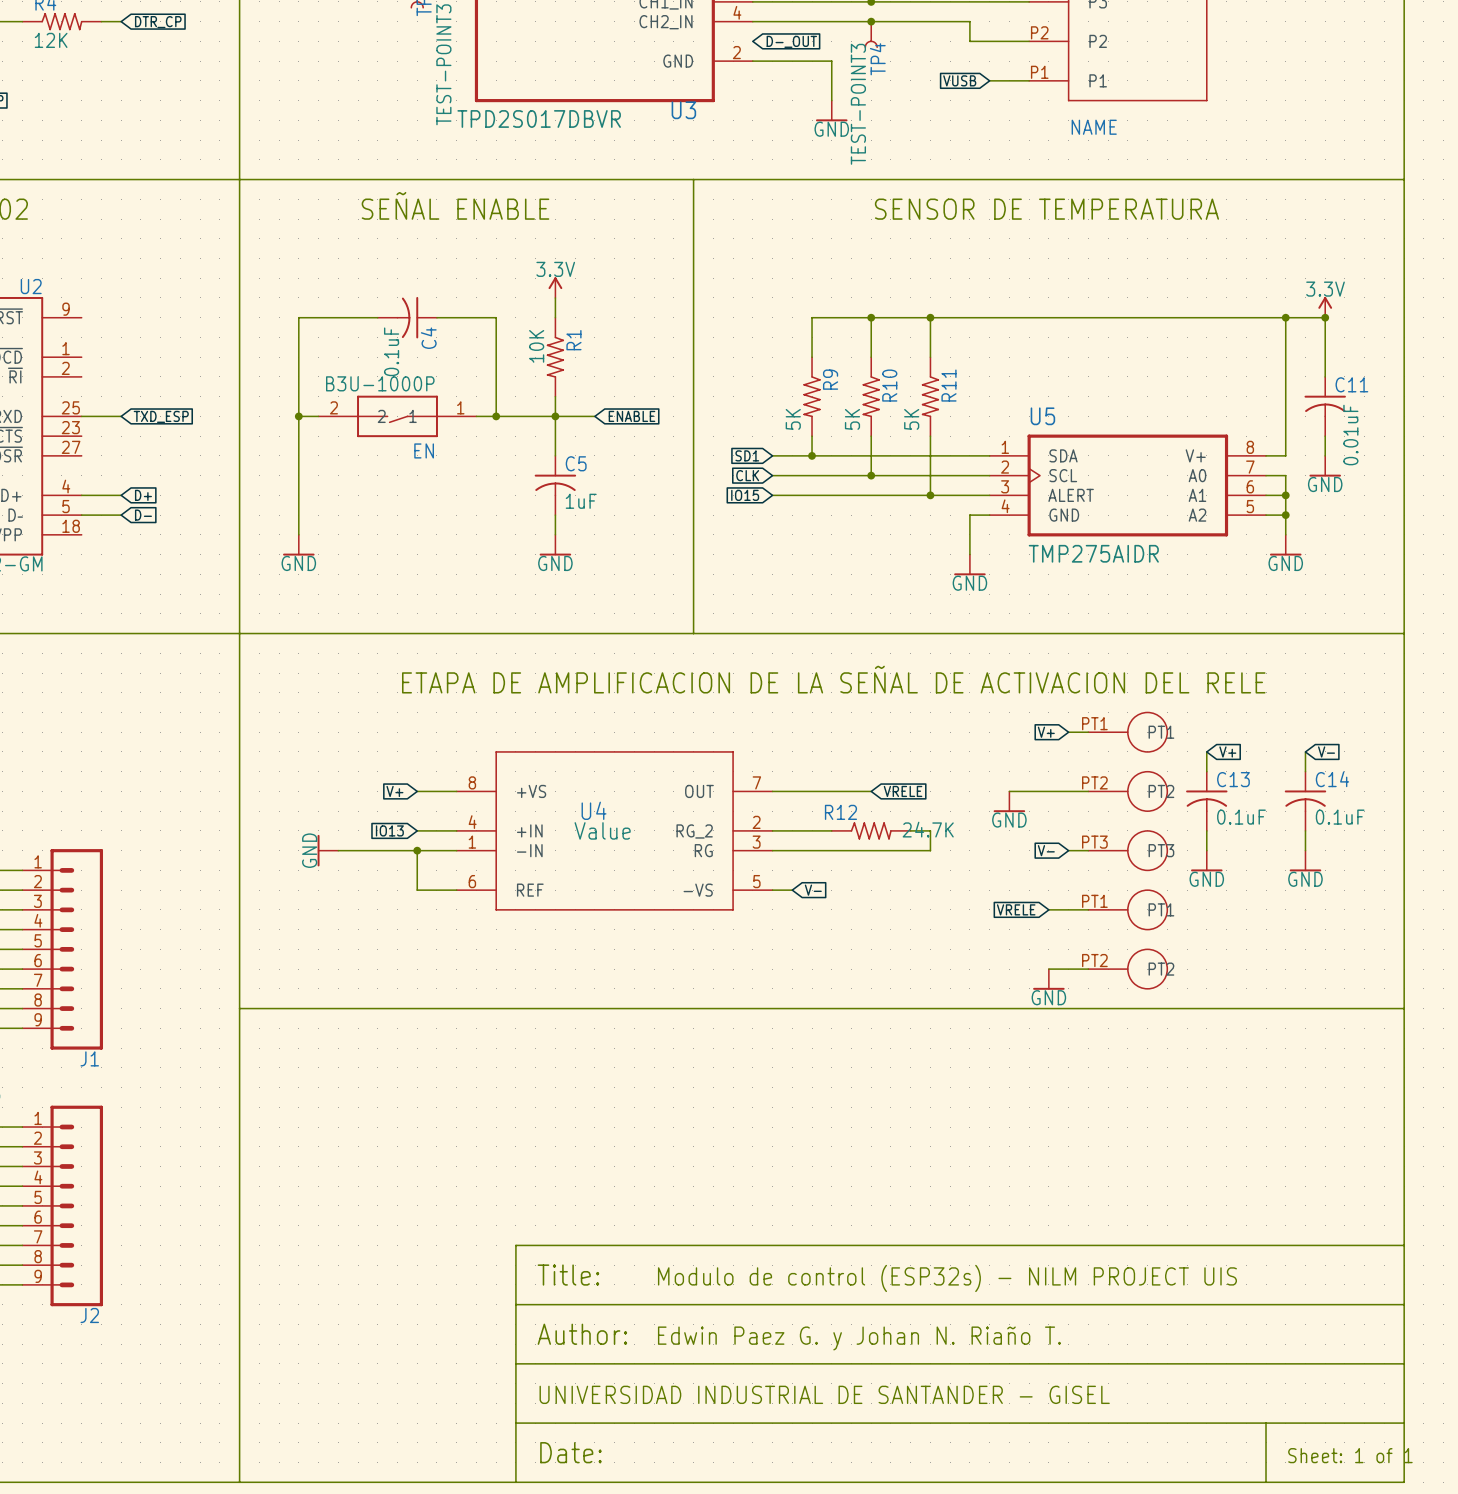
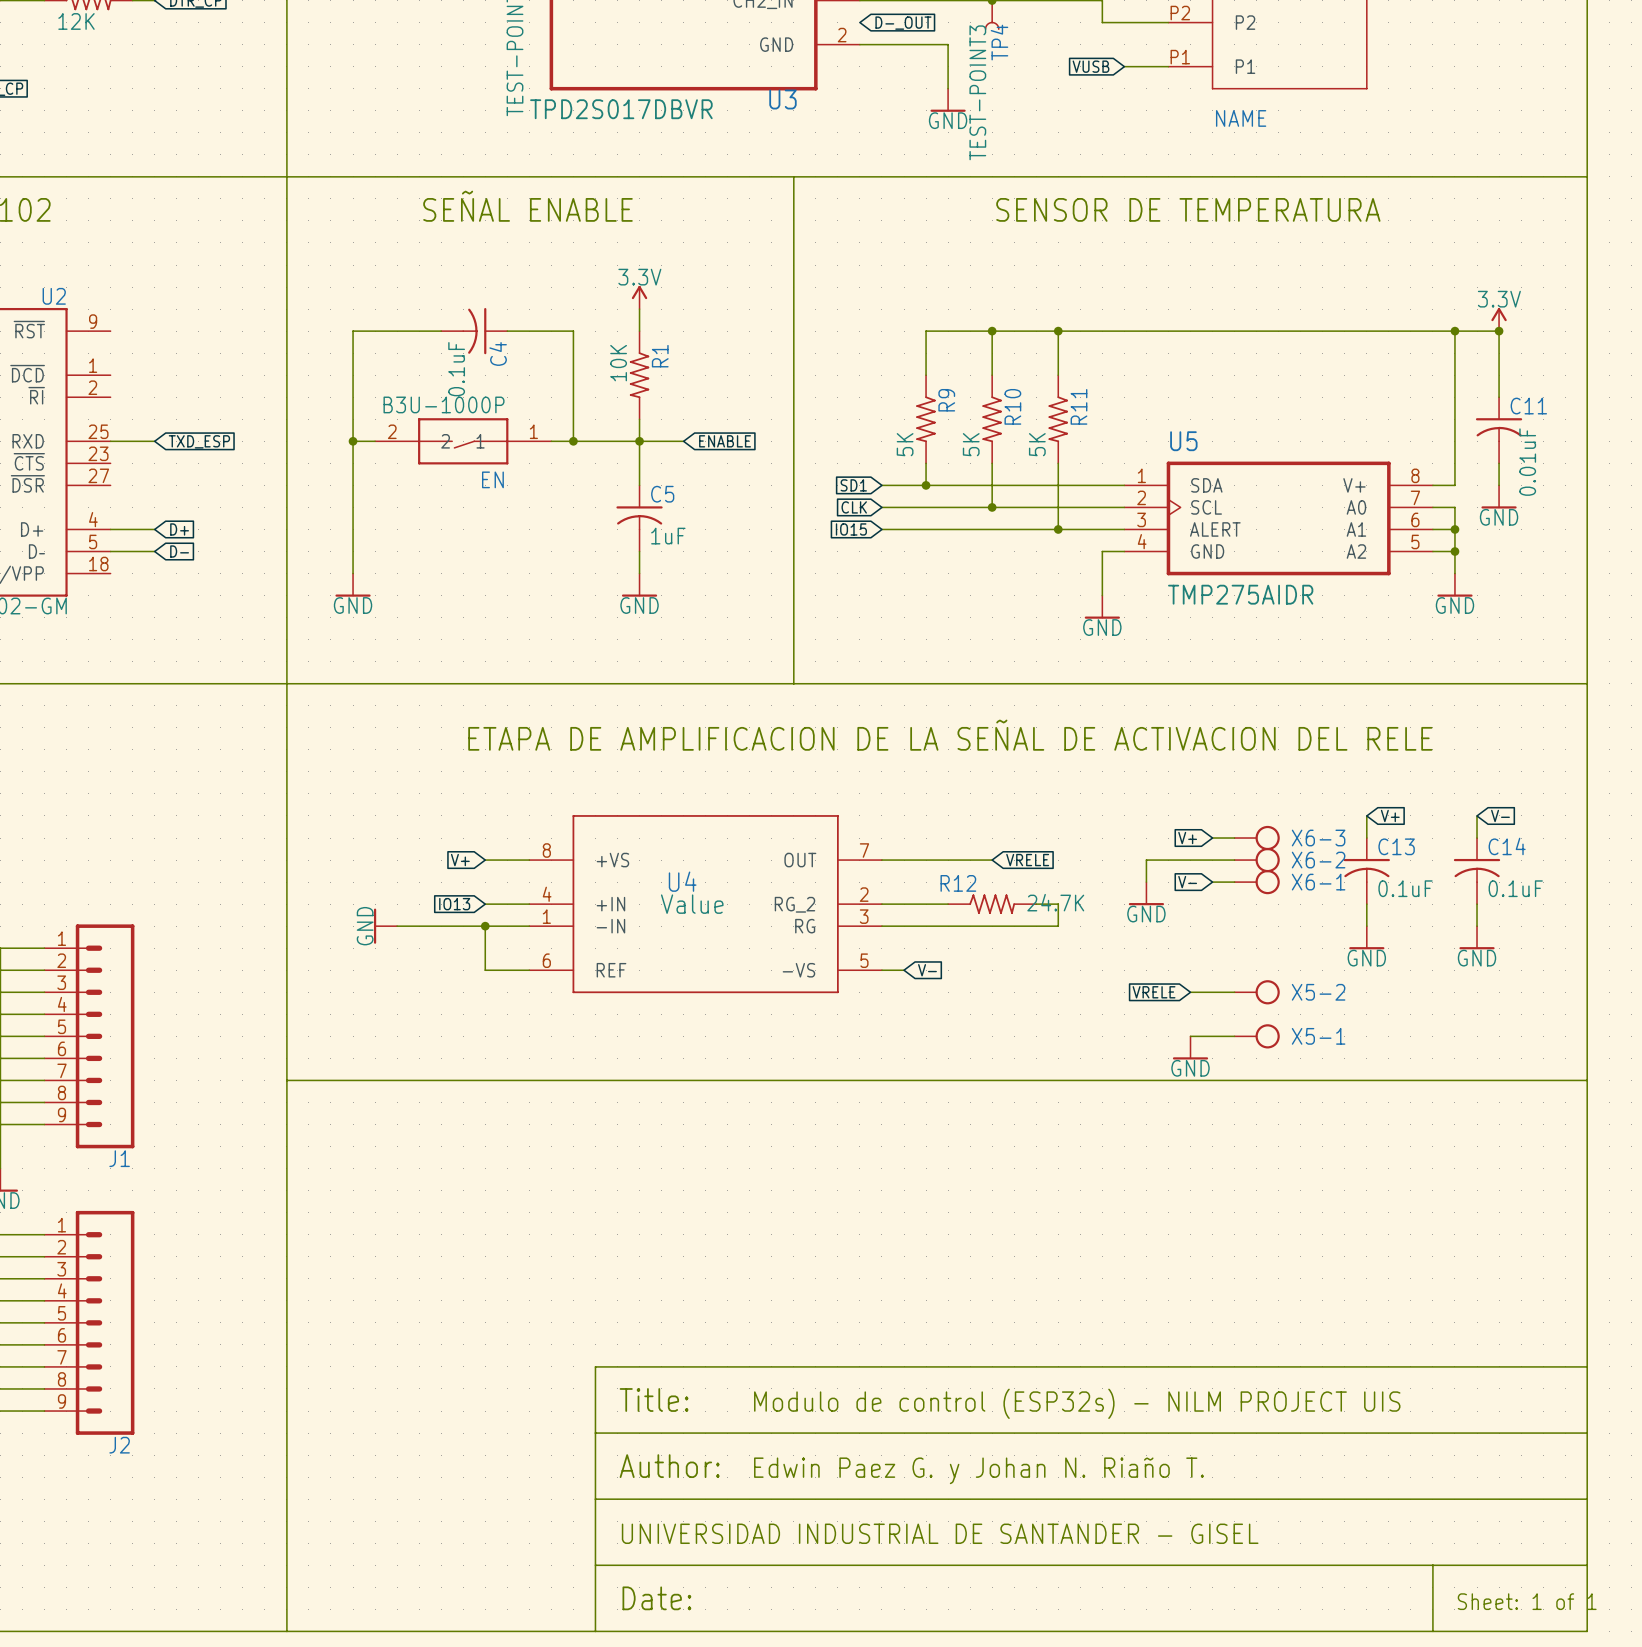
global label position: V+ (1046, 732) -> V+ (1187, 838)
wire: (1068, 732) (1088, 732) -> (1212, 838) (1234, 838)
X6-3: none -> (1257, 838)
X6-2: none -> (1257, 860)
part: (1128, 791) -> none
power symbol position: GND (1009, 801) -> GND (1146, 893)
X6-1: none -> (1257, 882)
global label position: V- (1046, 850) -> V- (1187, 882)
wire: (1068, 850) (1088, 850) -> (1212, 882) (1234, 882)
X5-2: none -> (1257, 992)
part: (1128, 939) -> none
X5-1: none -> (1257, 1036)
wire: (1048, 969) (1088, 969) -> (1190, 1036) (1234, 1036)
power symbol position: GND (1048, 979) -> GND (1190, 1047)
wire: (239, 1008) (1404, 1008) -> (286, 1080) (1587, 1080)

